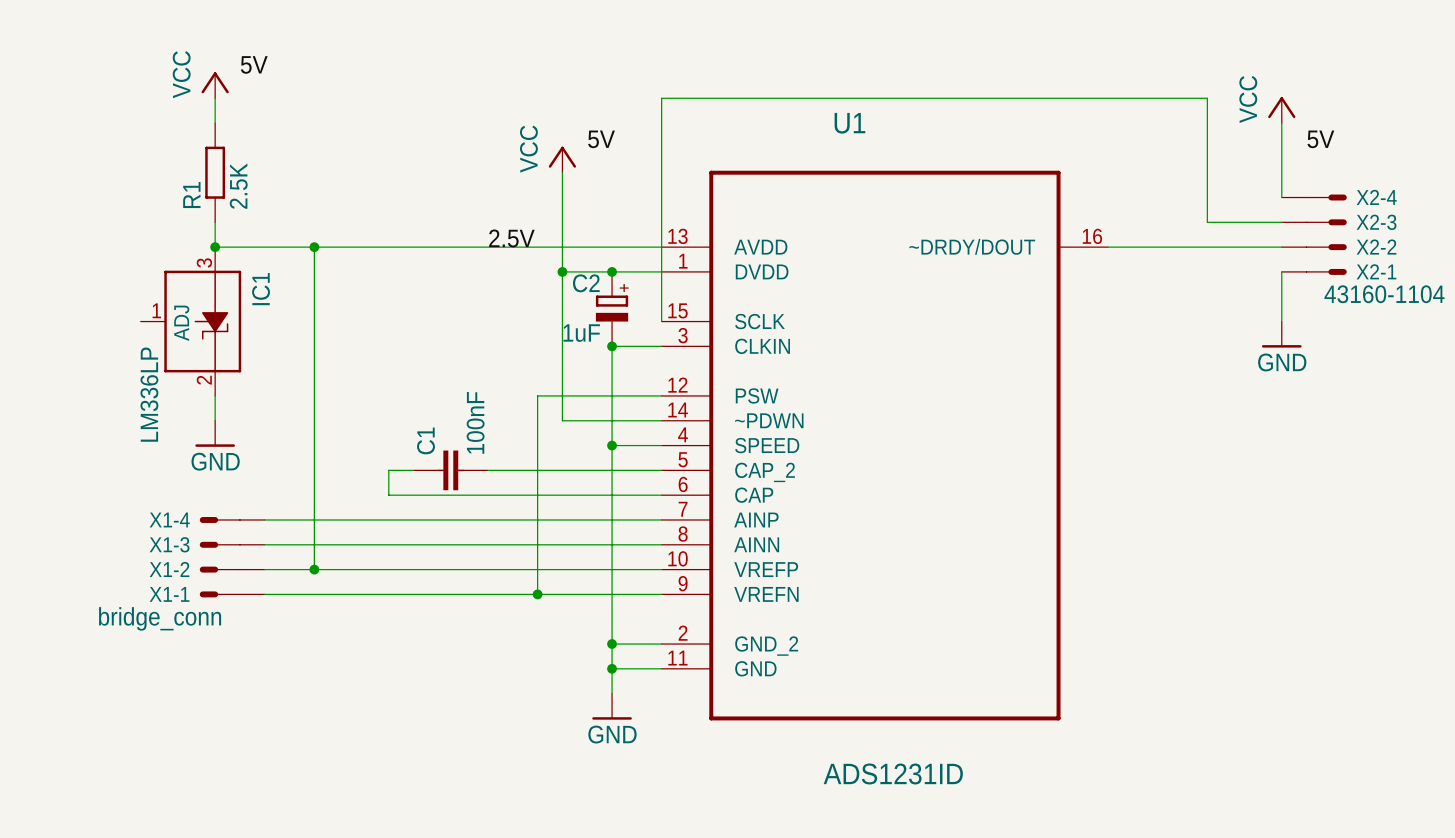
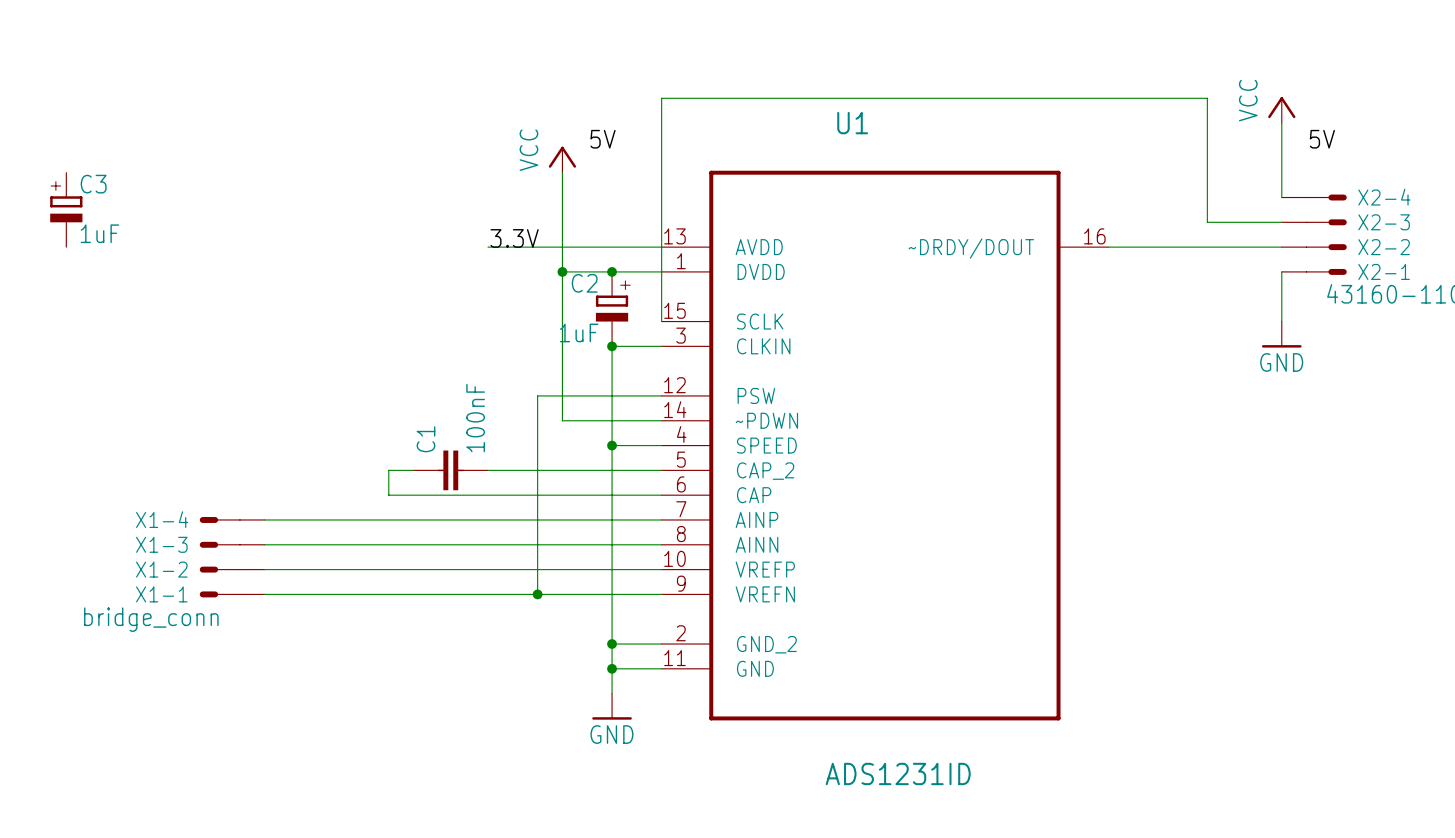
label: 5V (254, 64) -> none
power symbol: VCC (215, 85) -> none
wire: (215, 98) (215, 123) -> none
R1: 2.5K (215, 172) -> none
C3: none -> 1uF (66, 209)
wire: (215, 222) (215, 247) (488, 247) -> none
label: 2.5V (511, 238) -> 3.3V (514, 238)
junction: (215, 247) -> none
wire: (314, 247) (314, 569) -> none
junction: (314, 247) -> none
IC1: LM336LP (190, 321) -> none
wire: (215, 395) (215, 420) -> none
power symbol: GND (215, 433) -> none
junction: (314, 569) -> none

